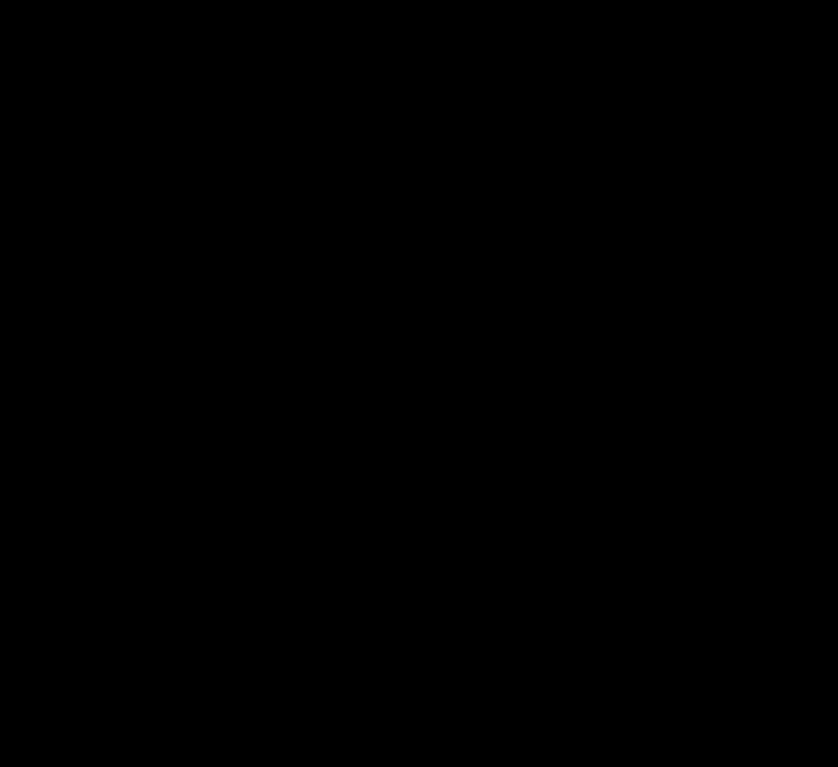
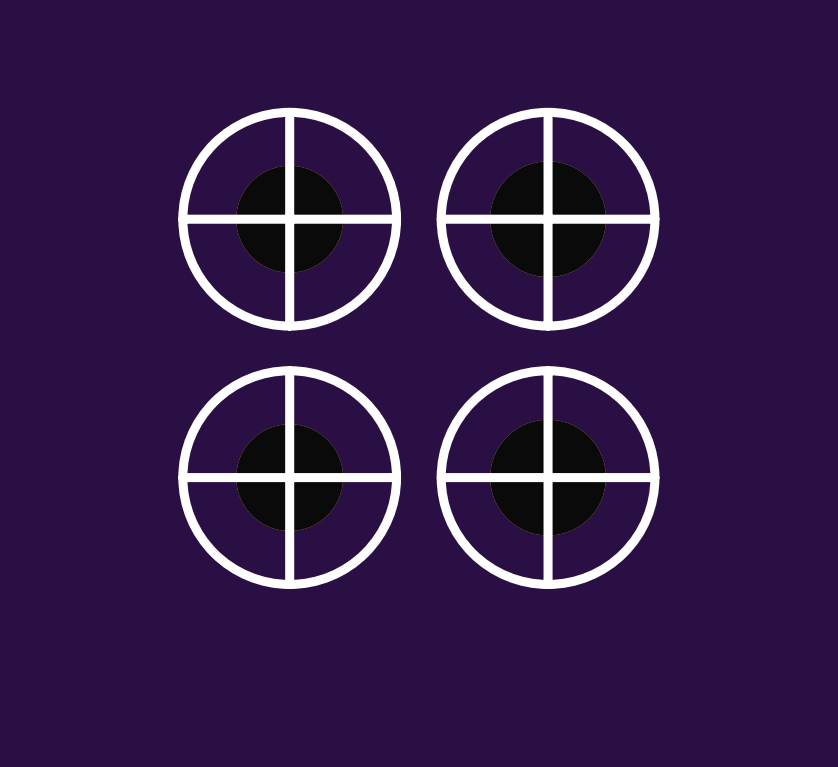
part: none -> (289, 219)
part: none -> (548, 219)
part: none -> (289, 477)
part: none -> (548, 477)

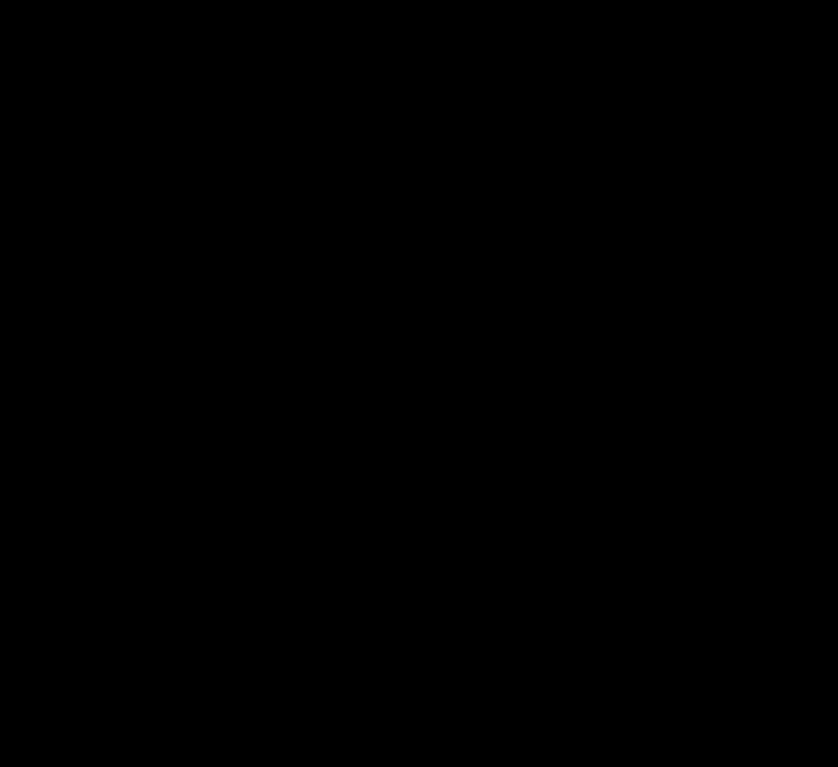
part: (289, 219) -> none
part: (548, 219) -> none
part: (289, 477) -> none
part: (548, 477) -> none

